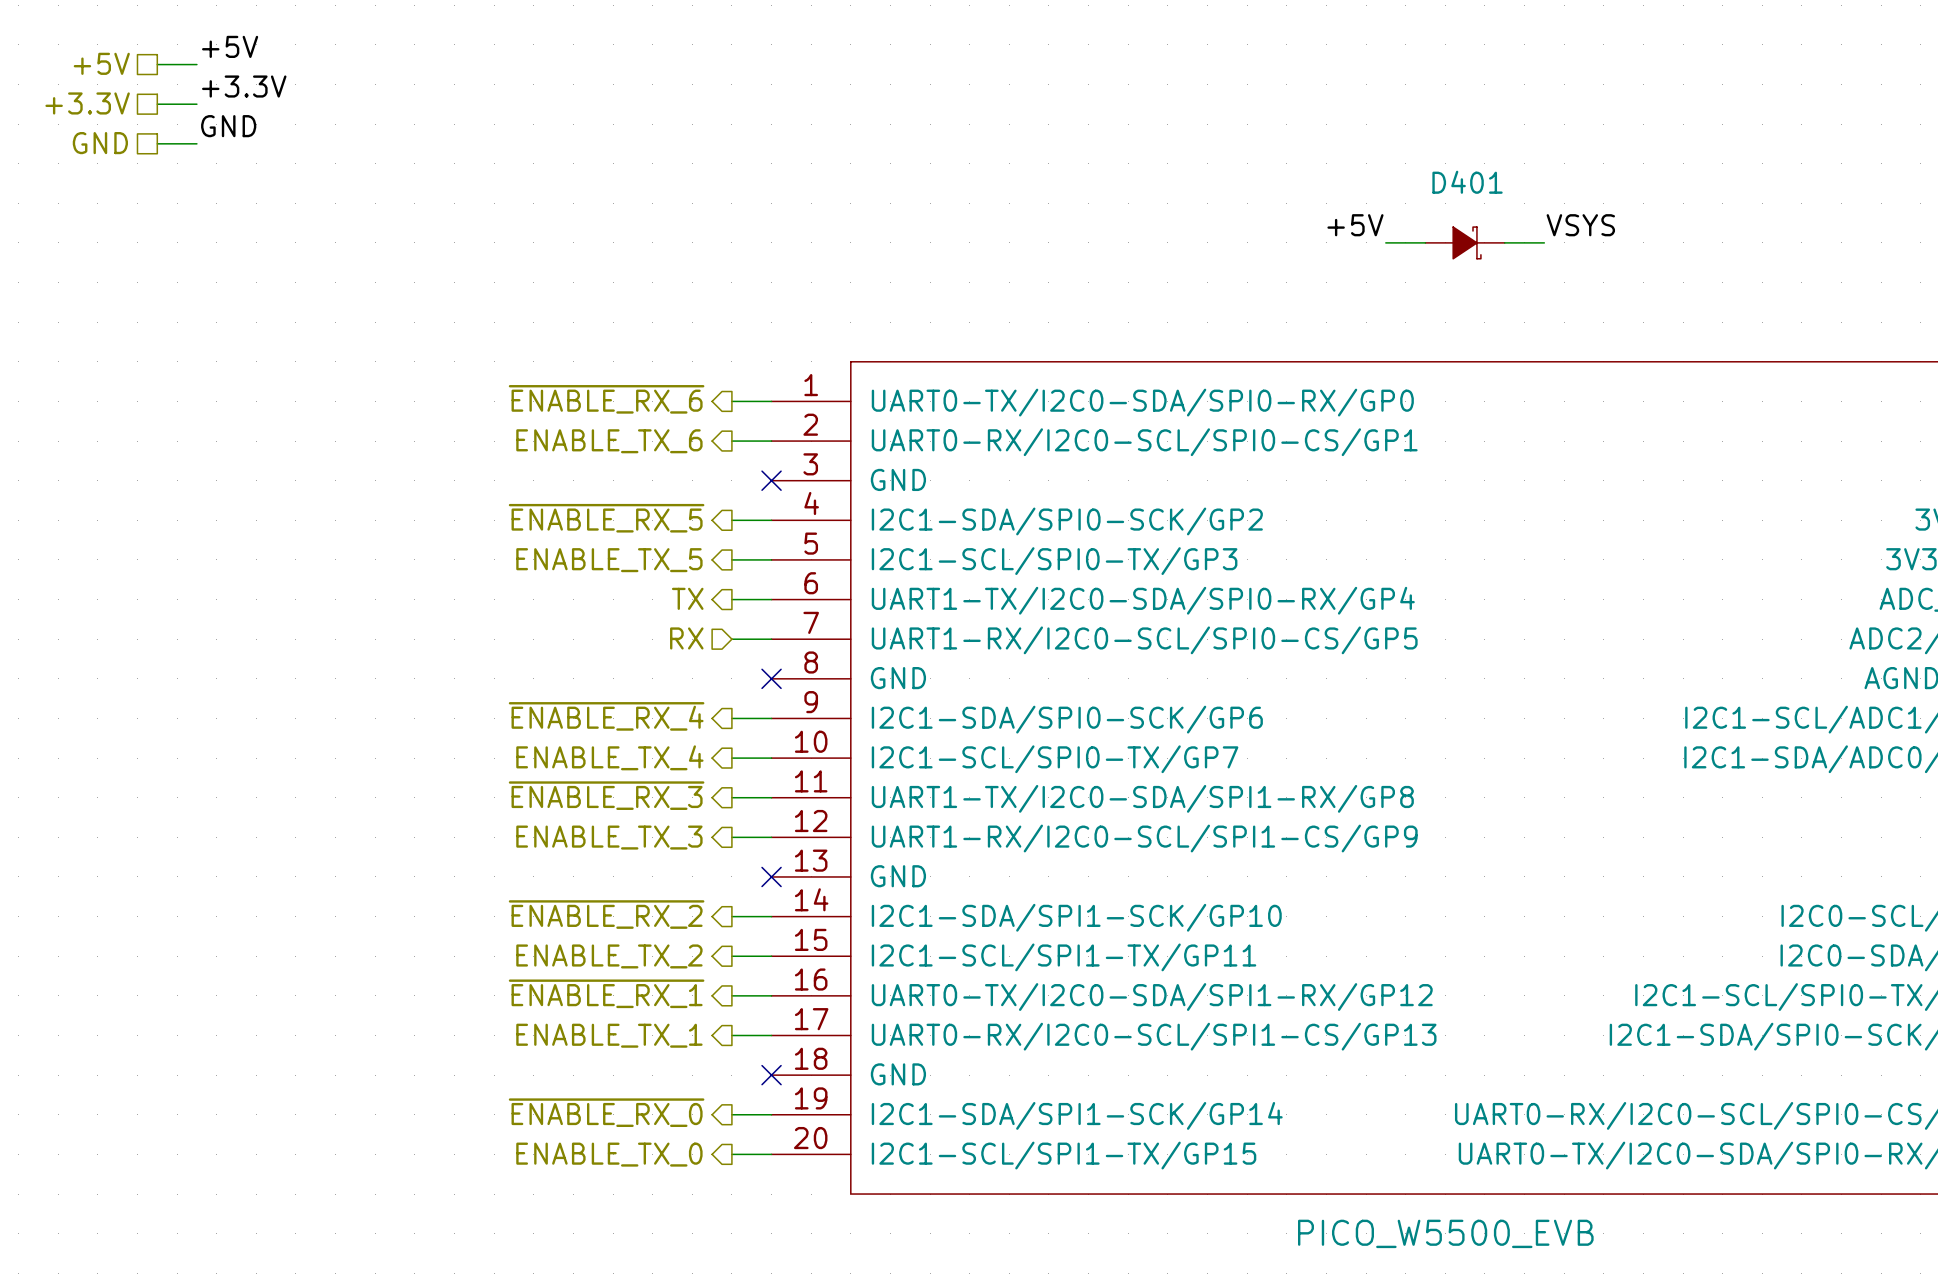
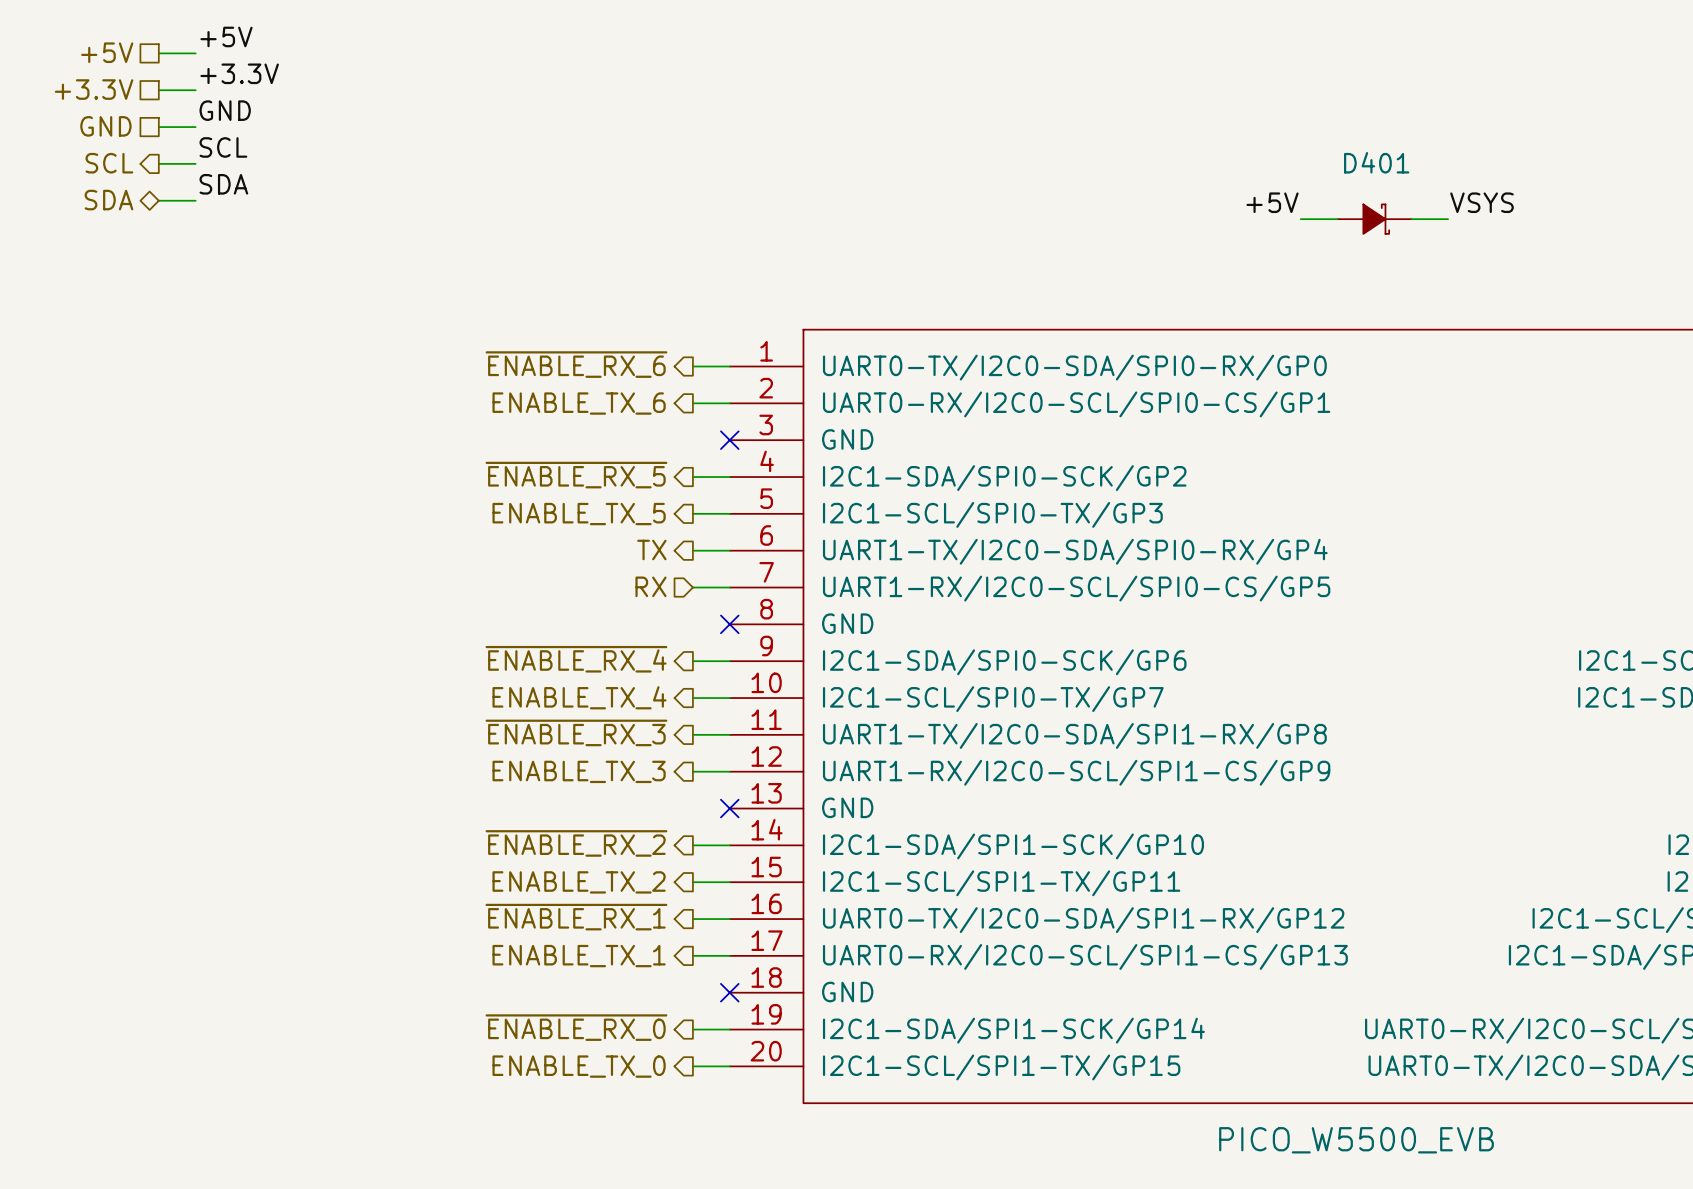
label: none -> SCL (223, 147)
hierarchical label: none -> SCL (109, 163)
wire: none -> (158, 163) (195, 163)
label: none -> SDA (223, 184)
hierarchical label: none -> SDA (108, 200)
wire: none -> (158, 200) (195, 200)

